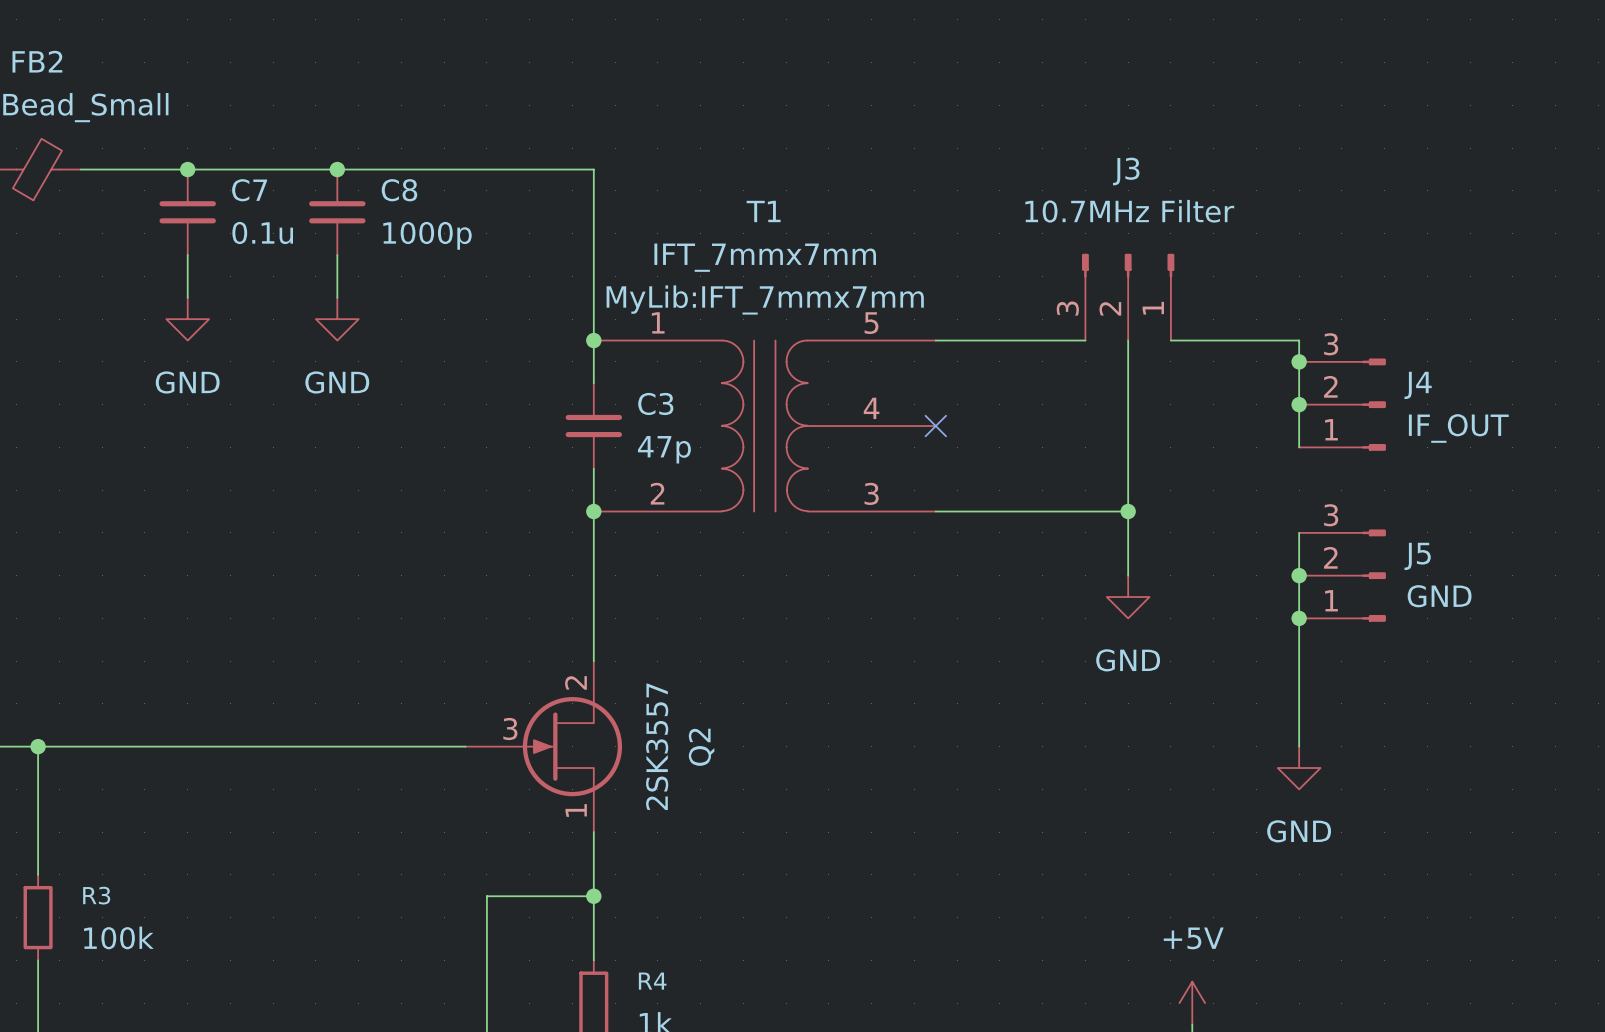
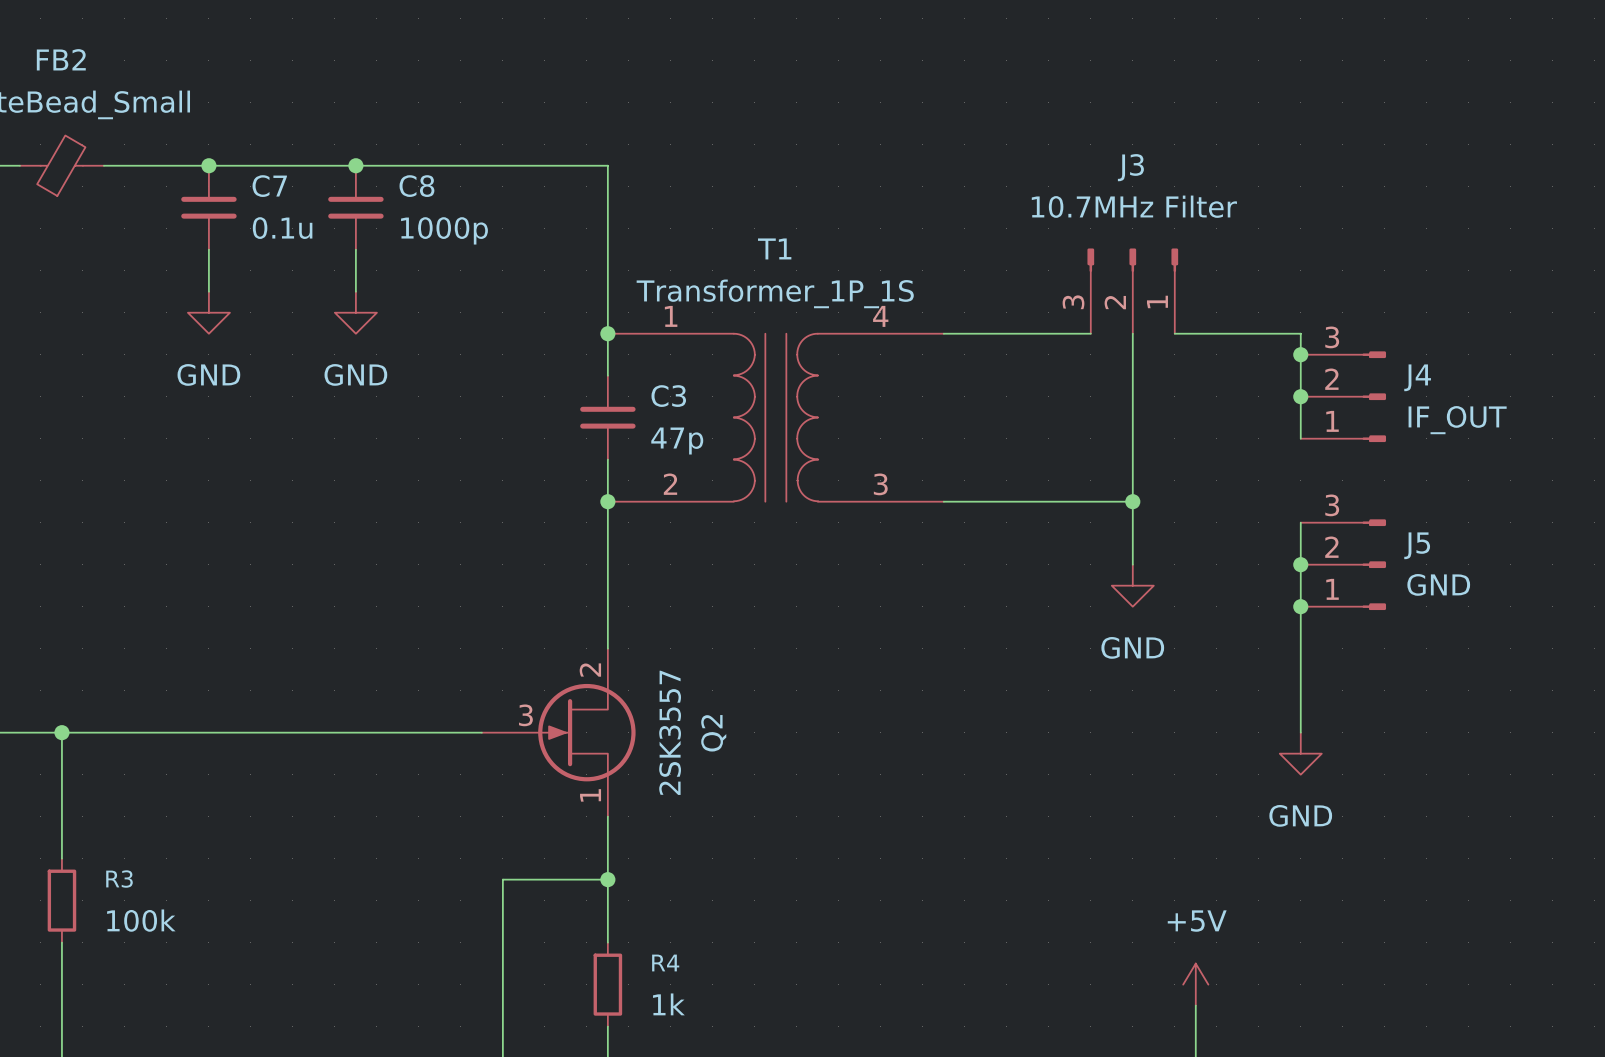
T1 name position: T1 (763, 211) -> T1 (774, 248)
T1 value: IFT_7mmx7mm (765, 257) -> Transformer_1P_1S (775, 293)
T1 text: MyLib:IFT_7mmx7mm (765, 299) -> none
T1 symbol: [593, 340, 936, 512] -> [607, 333, 944, 502]
no-connect mark: (935, 426) -> none

